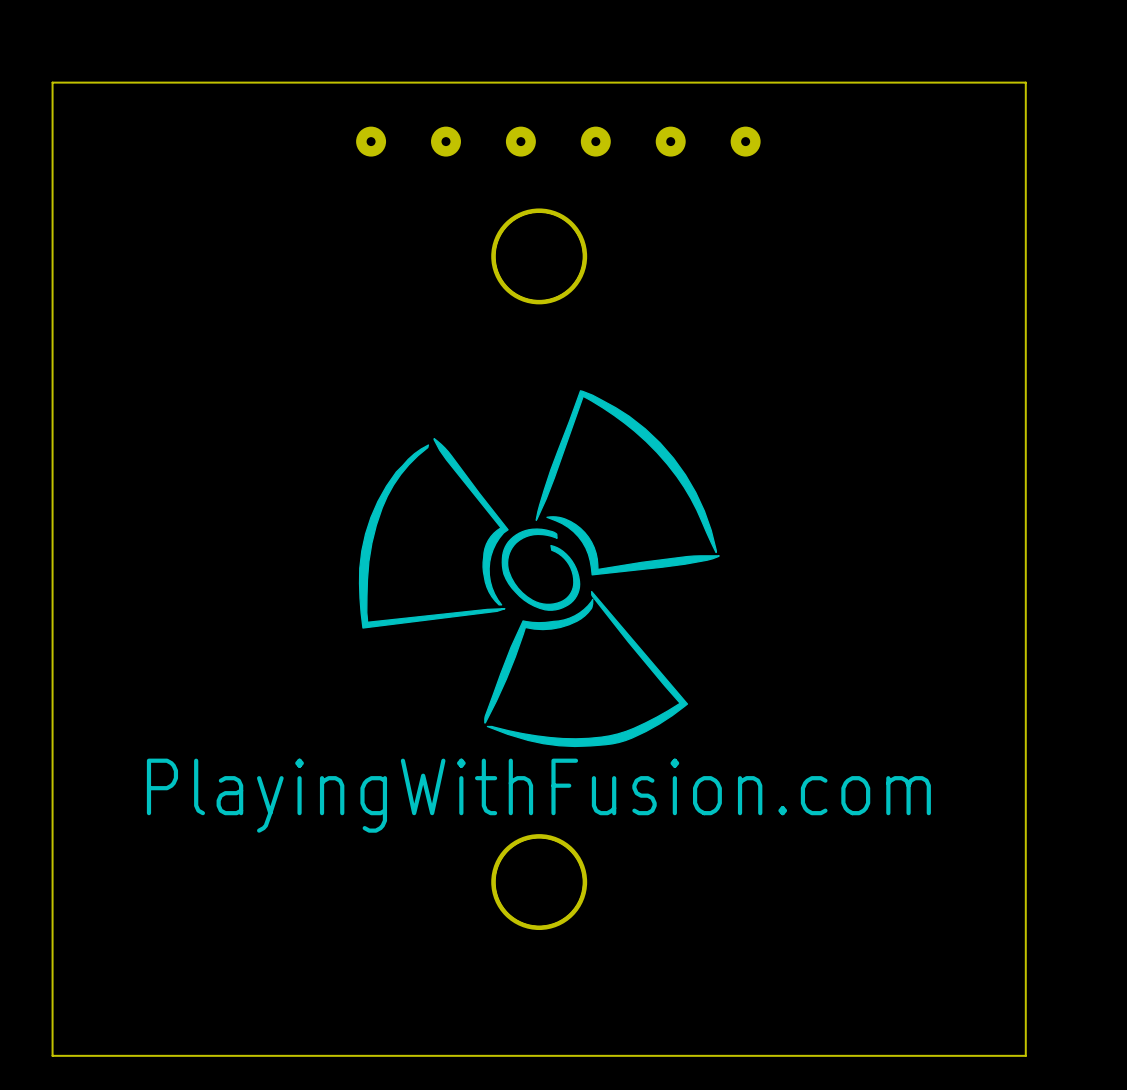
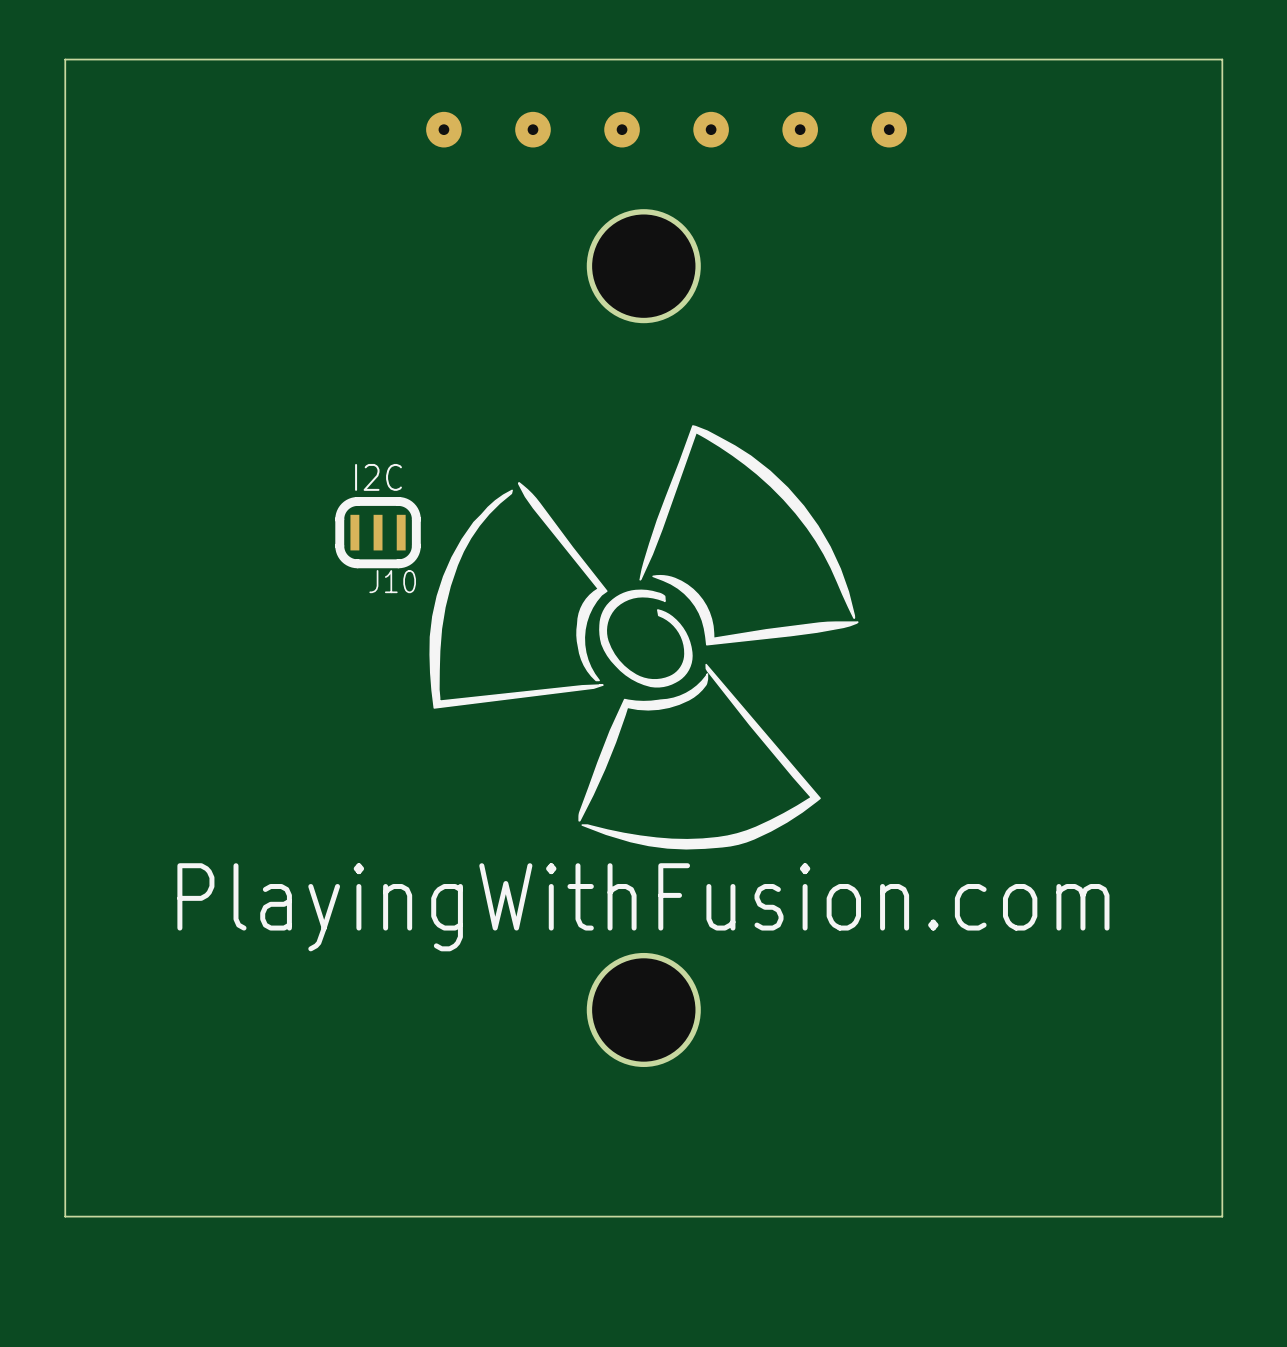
text: none -> I2C (378, 477)
J10: none -> (378, 532)

